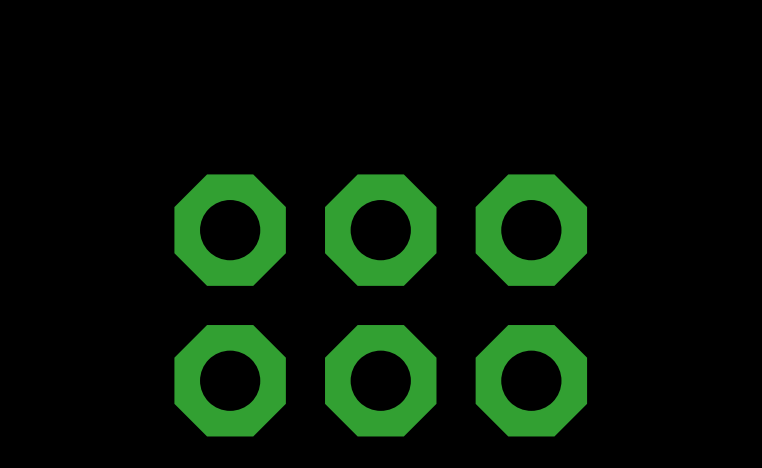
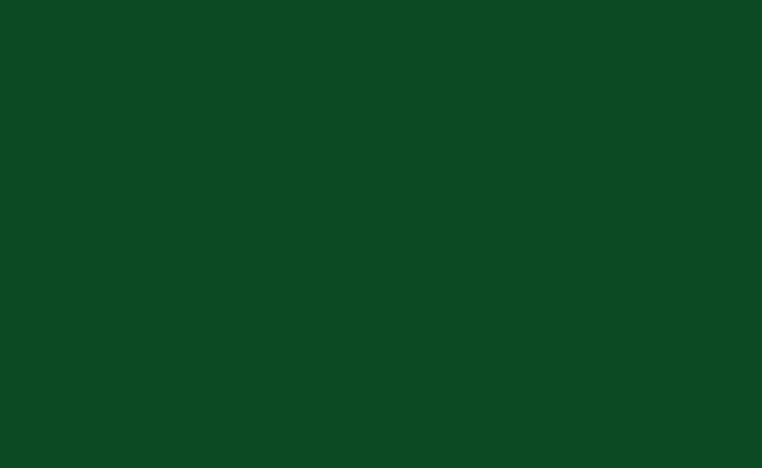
part: (380, 305) -> none

